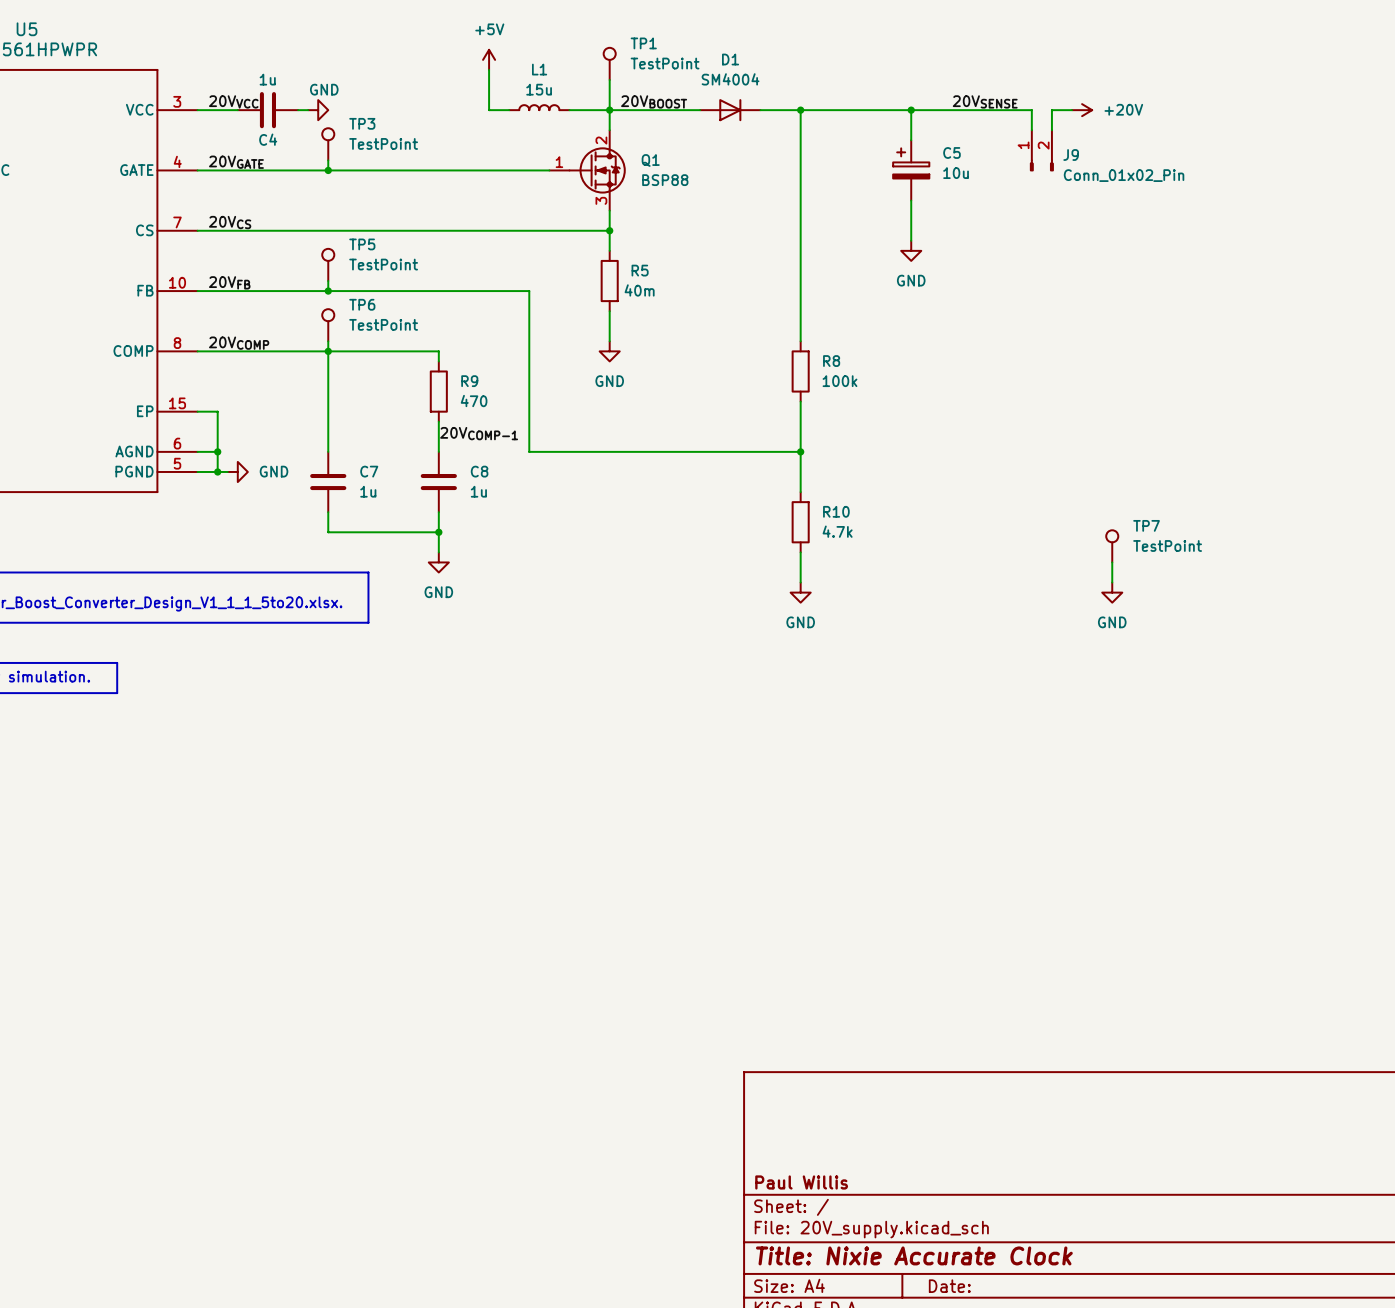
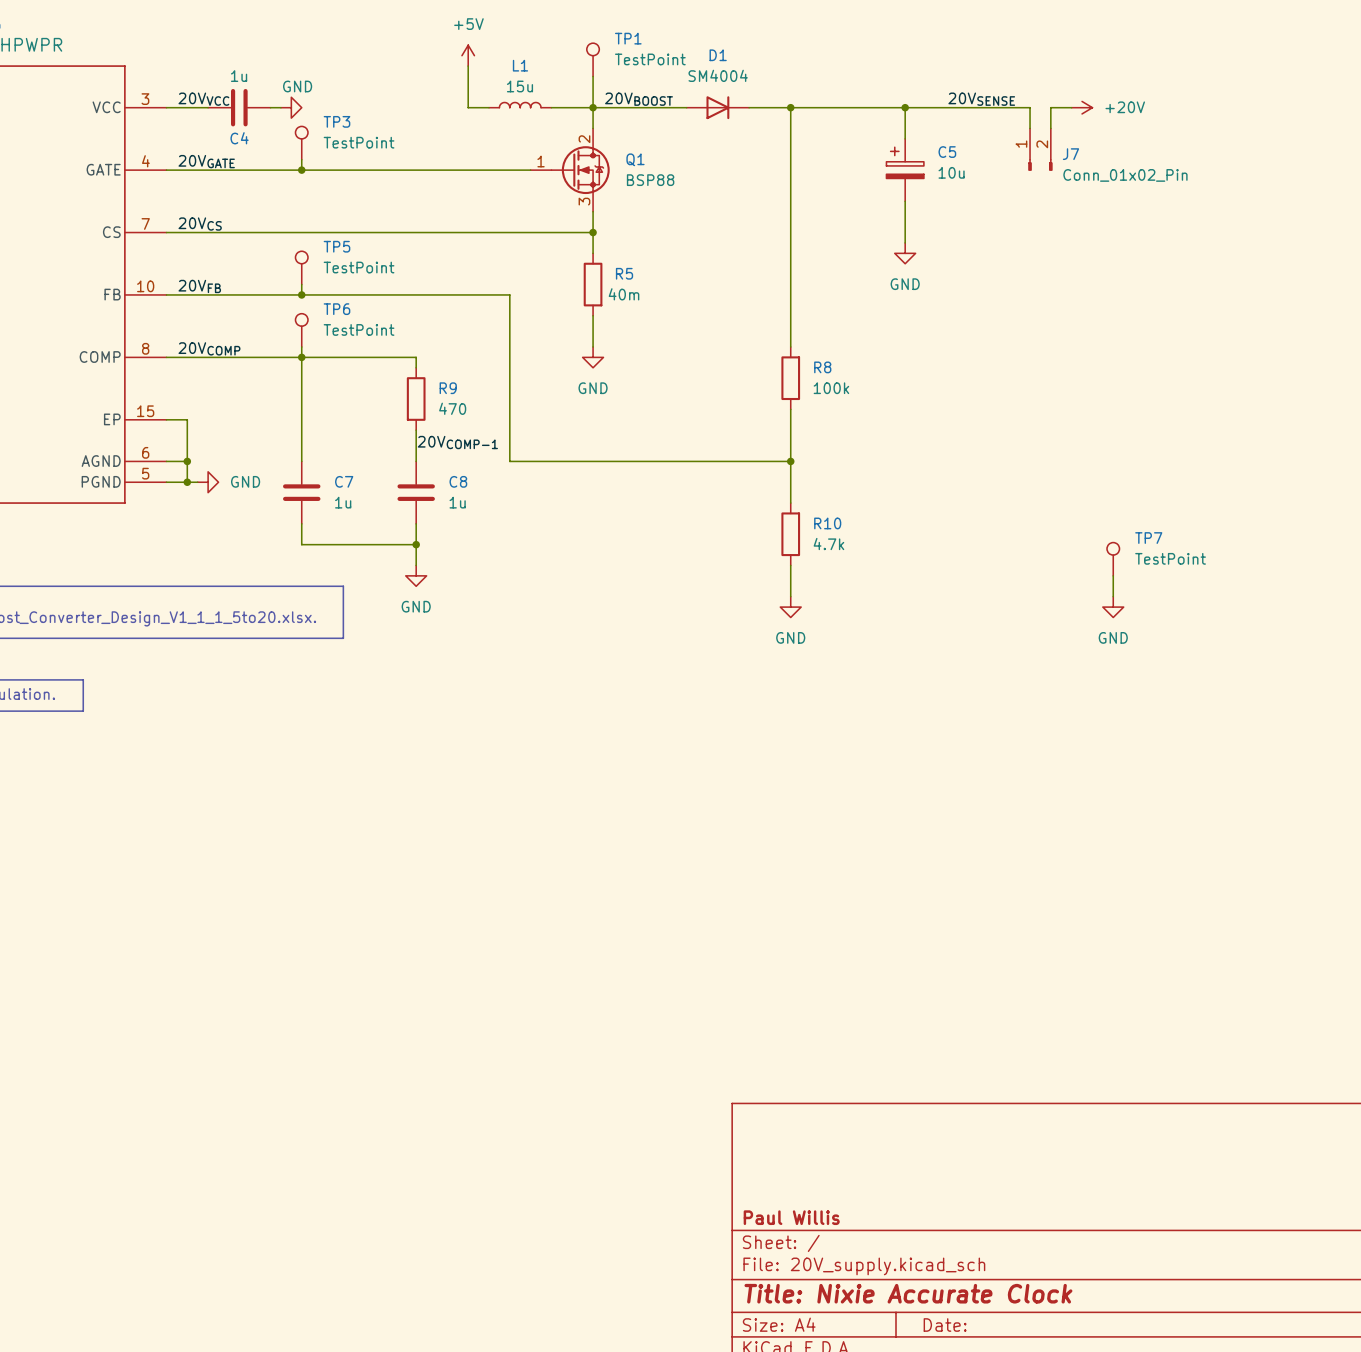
J9 name: J9 (1071, 155) -> J7 (1070, 154)

